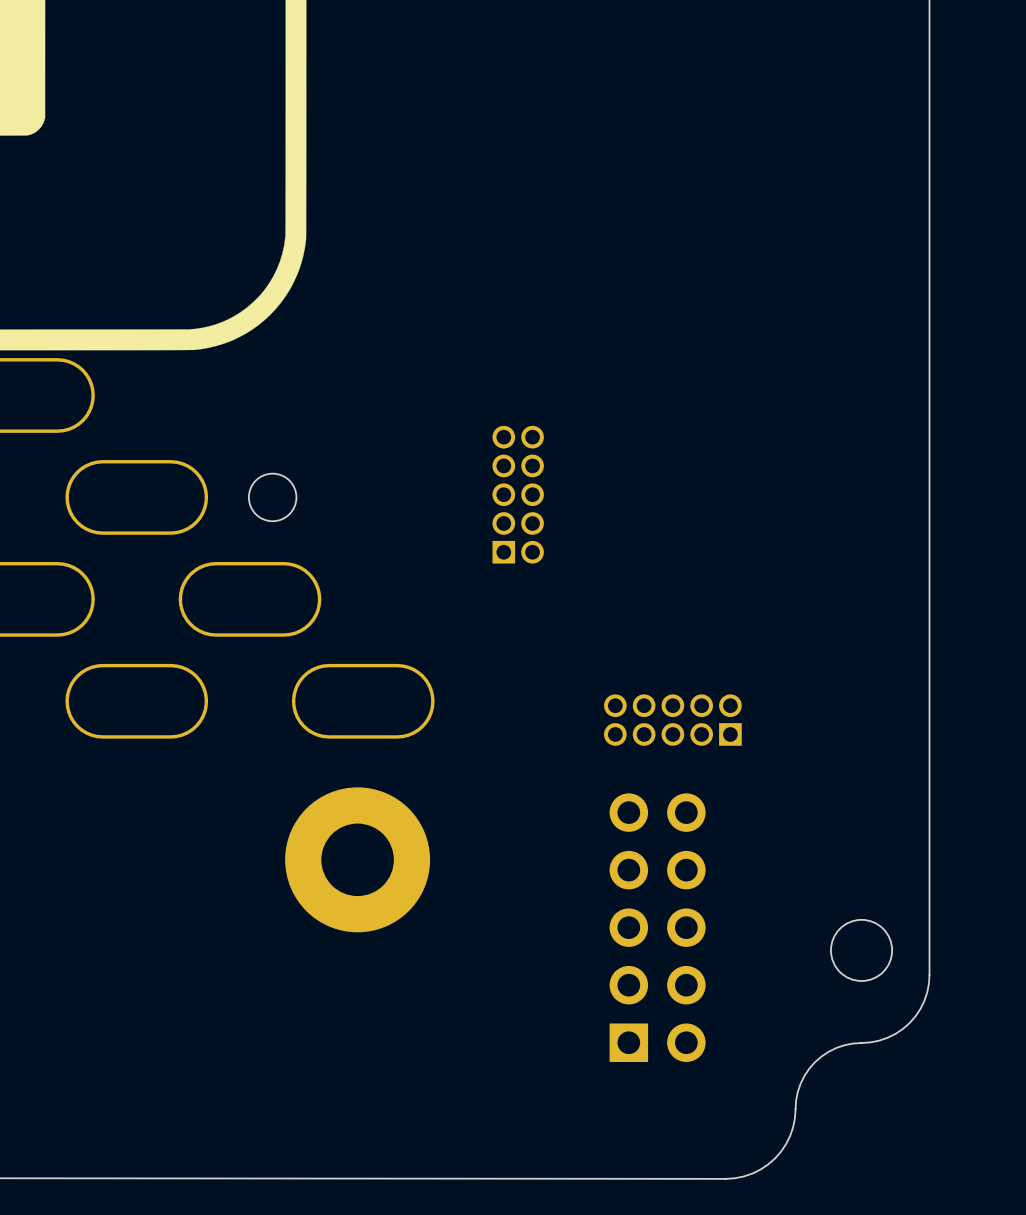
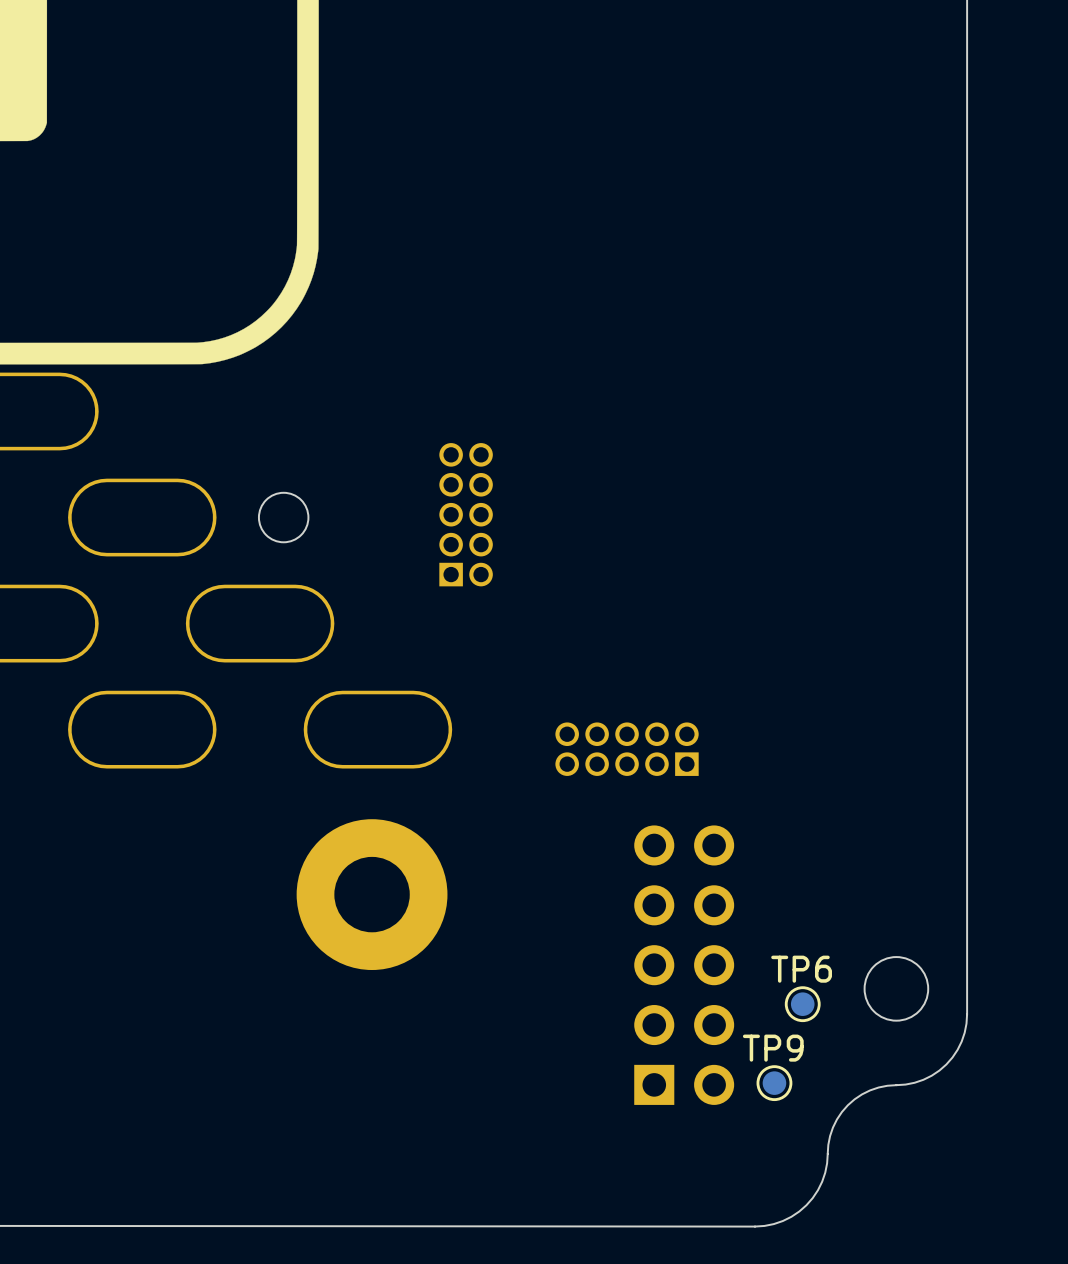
part position: (518, 494) -> (466, 514)
part position: (672, 720) -> (627, 749)
TP6: none -> (802, 1004)
TP9: none -> (774, 1083)

